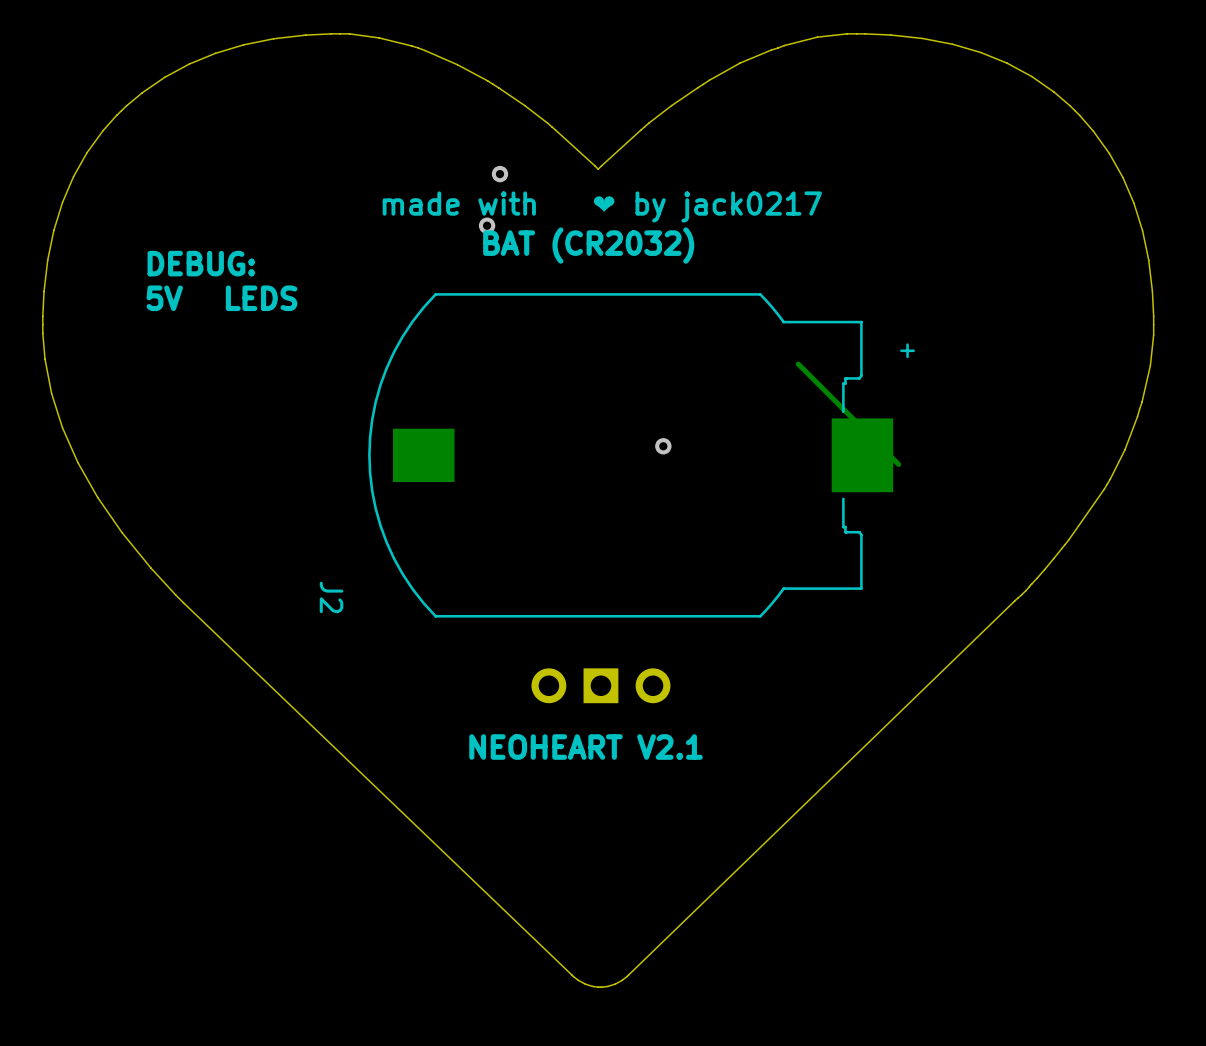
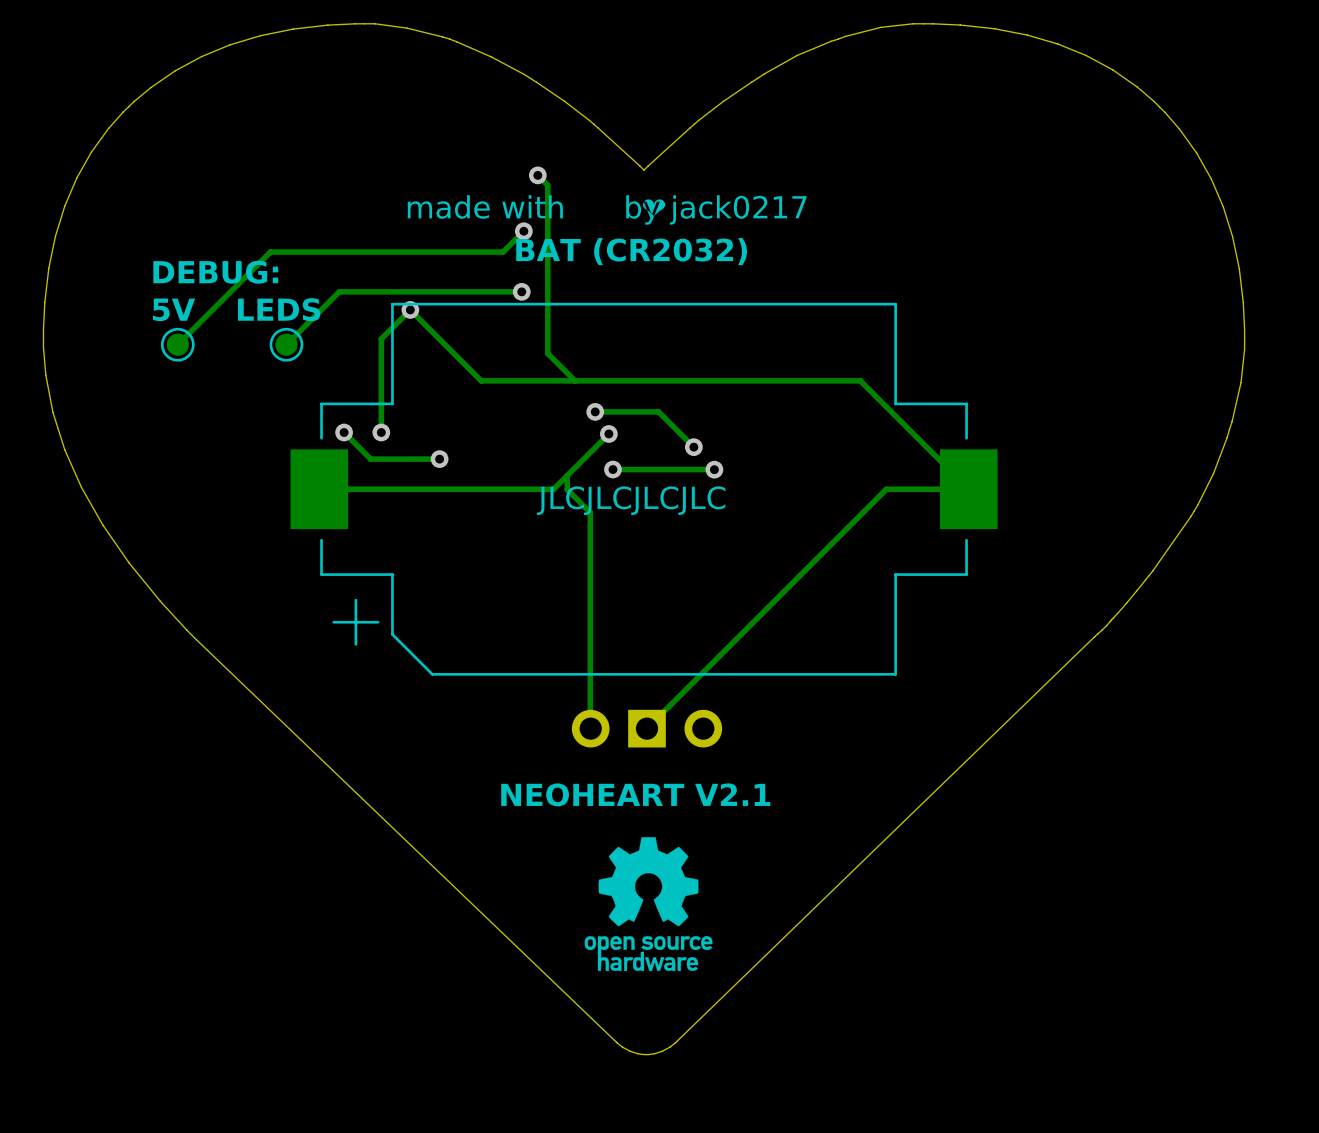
track: none -> (537, 175) (547, 185) (547, 353) (575, 380)
track: none -> (523, 231) (503, 252) (270, 252) (177, 344)
track: none -> (521, 291) (339, 291) (286, 344)
via: none -> (521, 291)
via: none -> (410, 309)
part: none -> (177, 344)
part: none -> (286, 344)
track: none -> (860, 380) (481, 380) (410, 309) (381, 338) (381, 432)
track: none -> (595, 411) (658, 411) (693, 447)
via: none -> (595, 411)
track: none -> (344, 432) (370, 459) (439, 459)
via: none -> (344, 432)
via: none -> (381, 432)
via: none -> (608, 433)
via: none -> (693, 447)
via: none -> (439, 459)
via: none -> (612, 469)
track: none -> (714, 469) (612, 469)
J2: (641, 455) -> none
track: none -> (319, 489) (553, 489) (608, 433) (567, 475) (567, 489) (590, 512) (590, 728)
part: none -> (644, 489)
track: none -> (968, 489) (886, 489) (646, 728)
text: none -> JLCJLCJLCJLC (631, 500)
drawing: none -> [584, 837, 713, 972]

